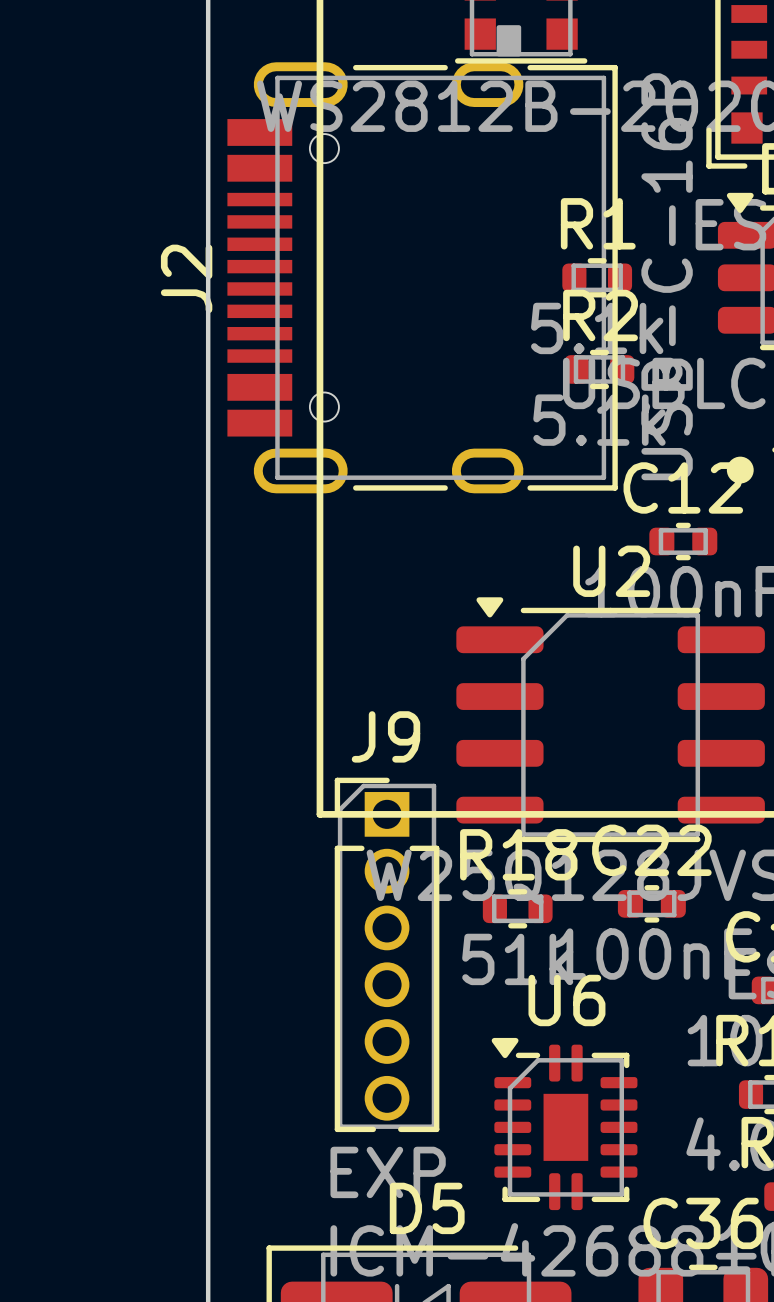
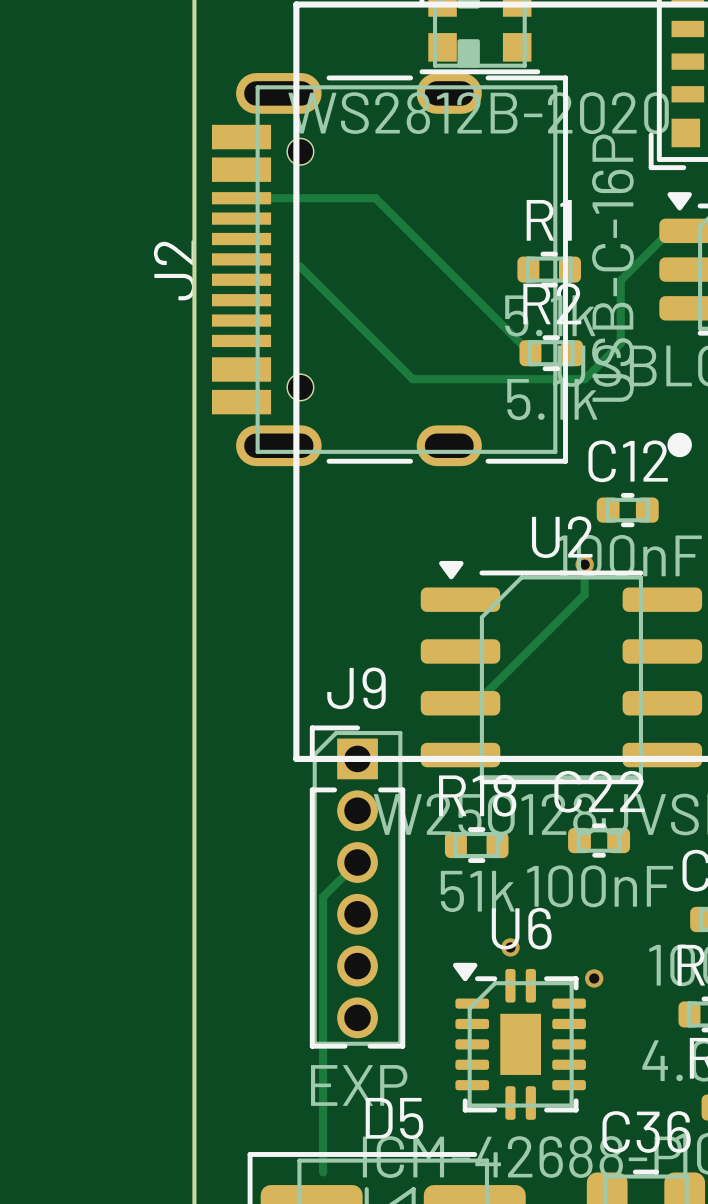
track: none -> (241, 198) (375, 198) (530, 353)
track: none -> (686, 230) (670, 230) (620, 280) (620, 343) (584, 379) (412, 379) (299, 266)
track: none -> (584, 564) (584, 594) (476, 703) (460, 703)
via: none -> (584, 564)
track: none -> (357, 862) (323, 896) (323, 1172)
via: none -> (510, 947)
via: none -> (594, 978)

